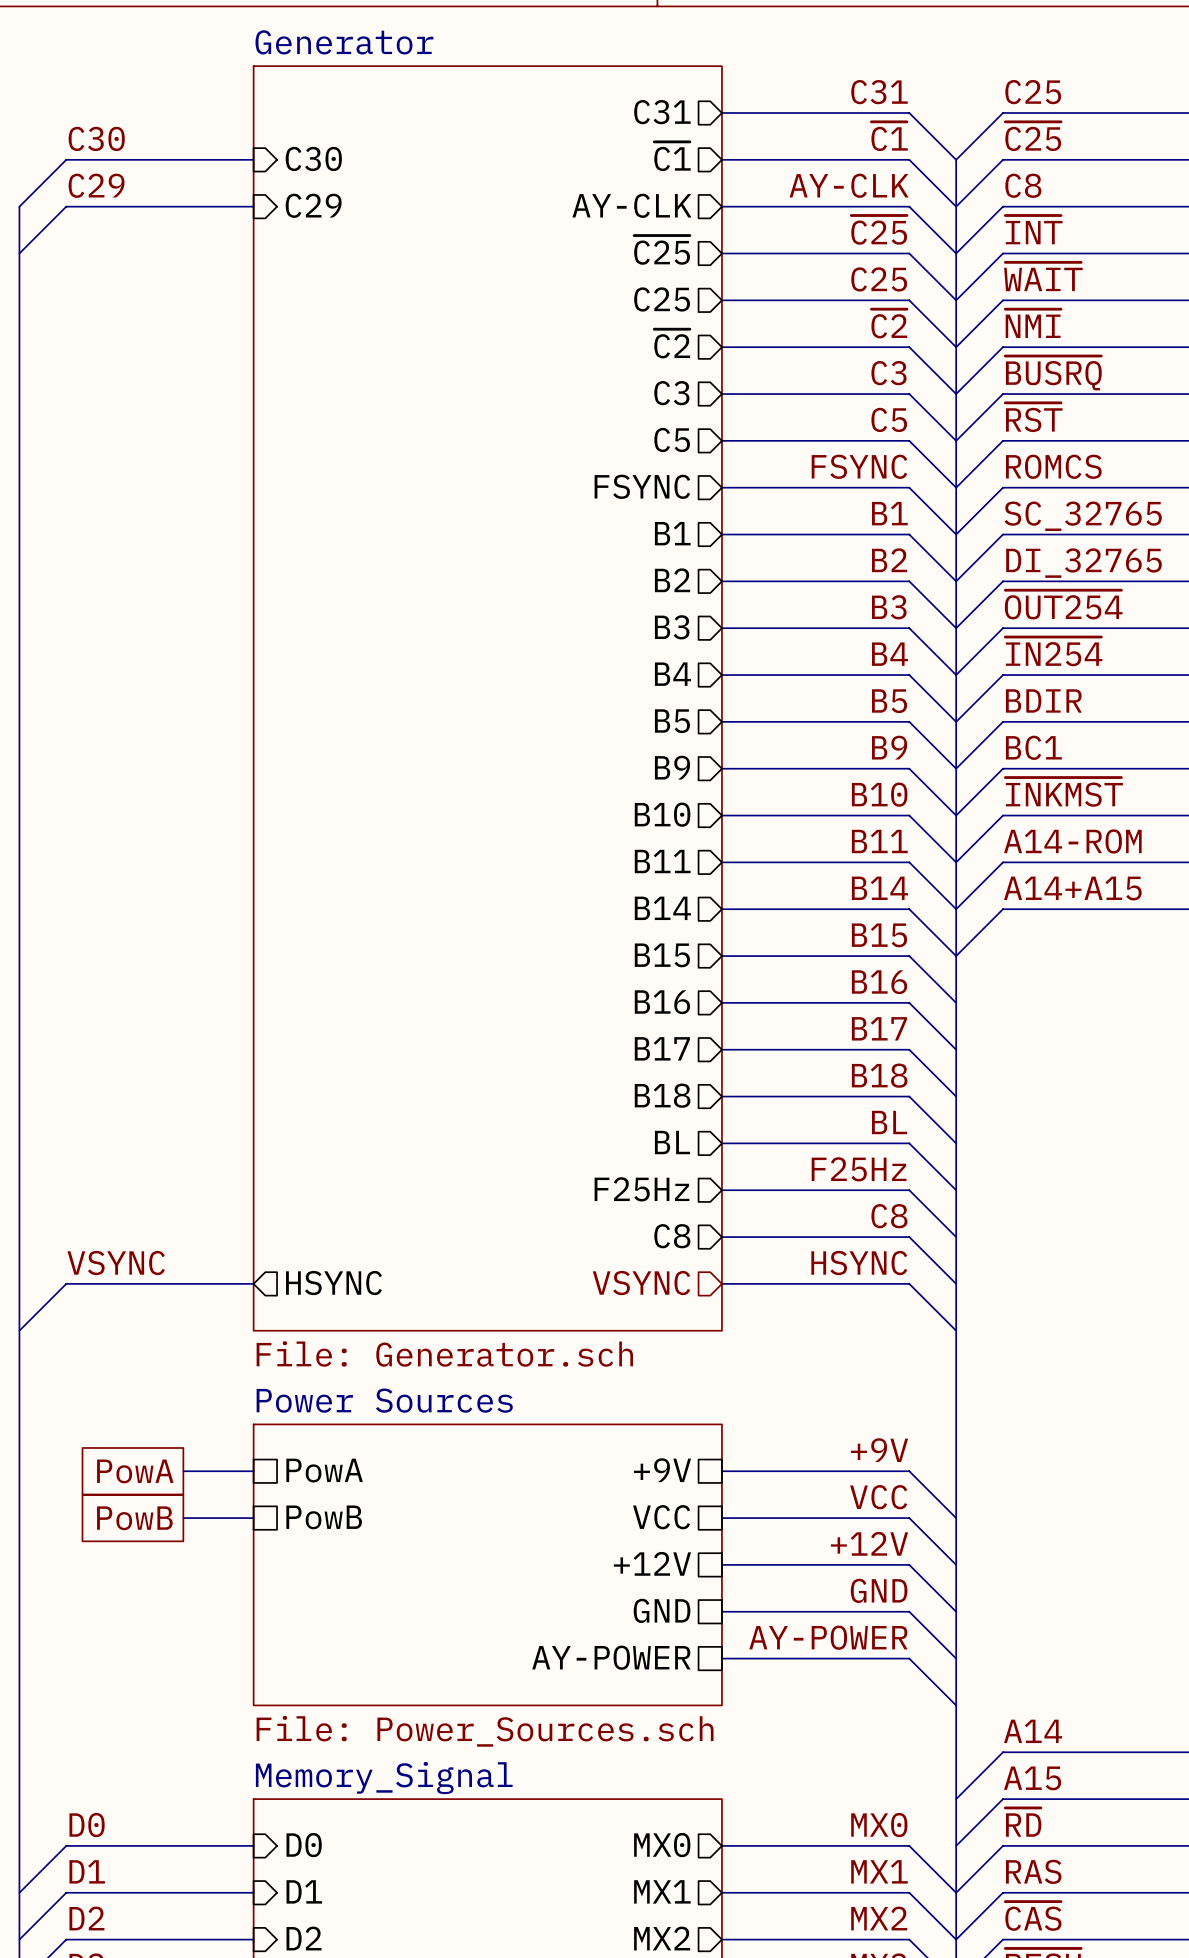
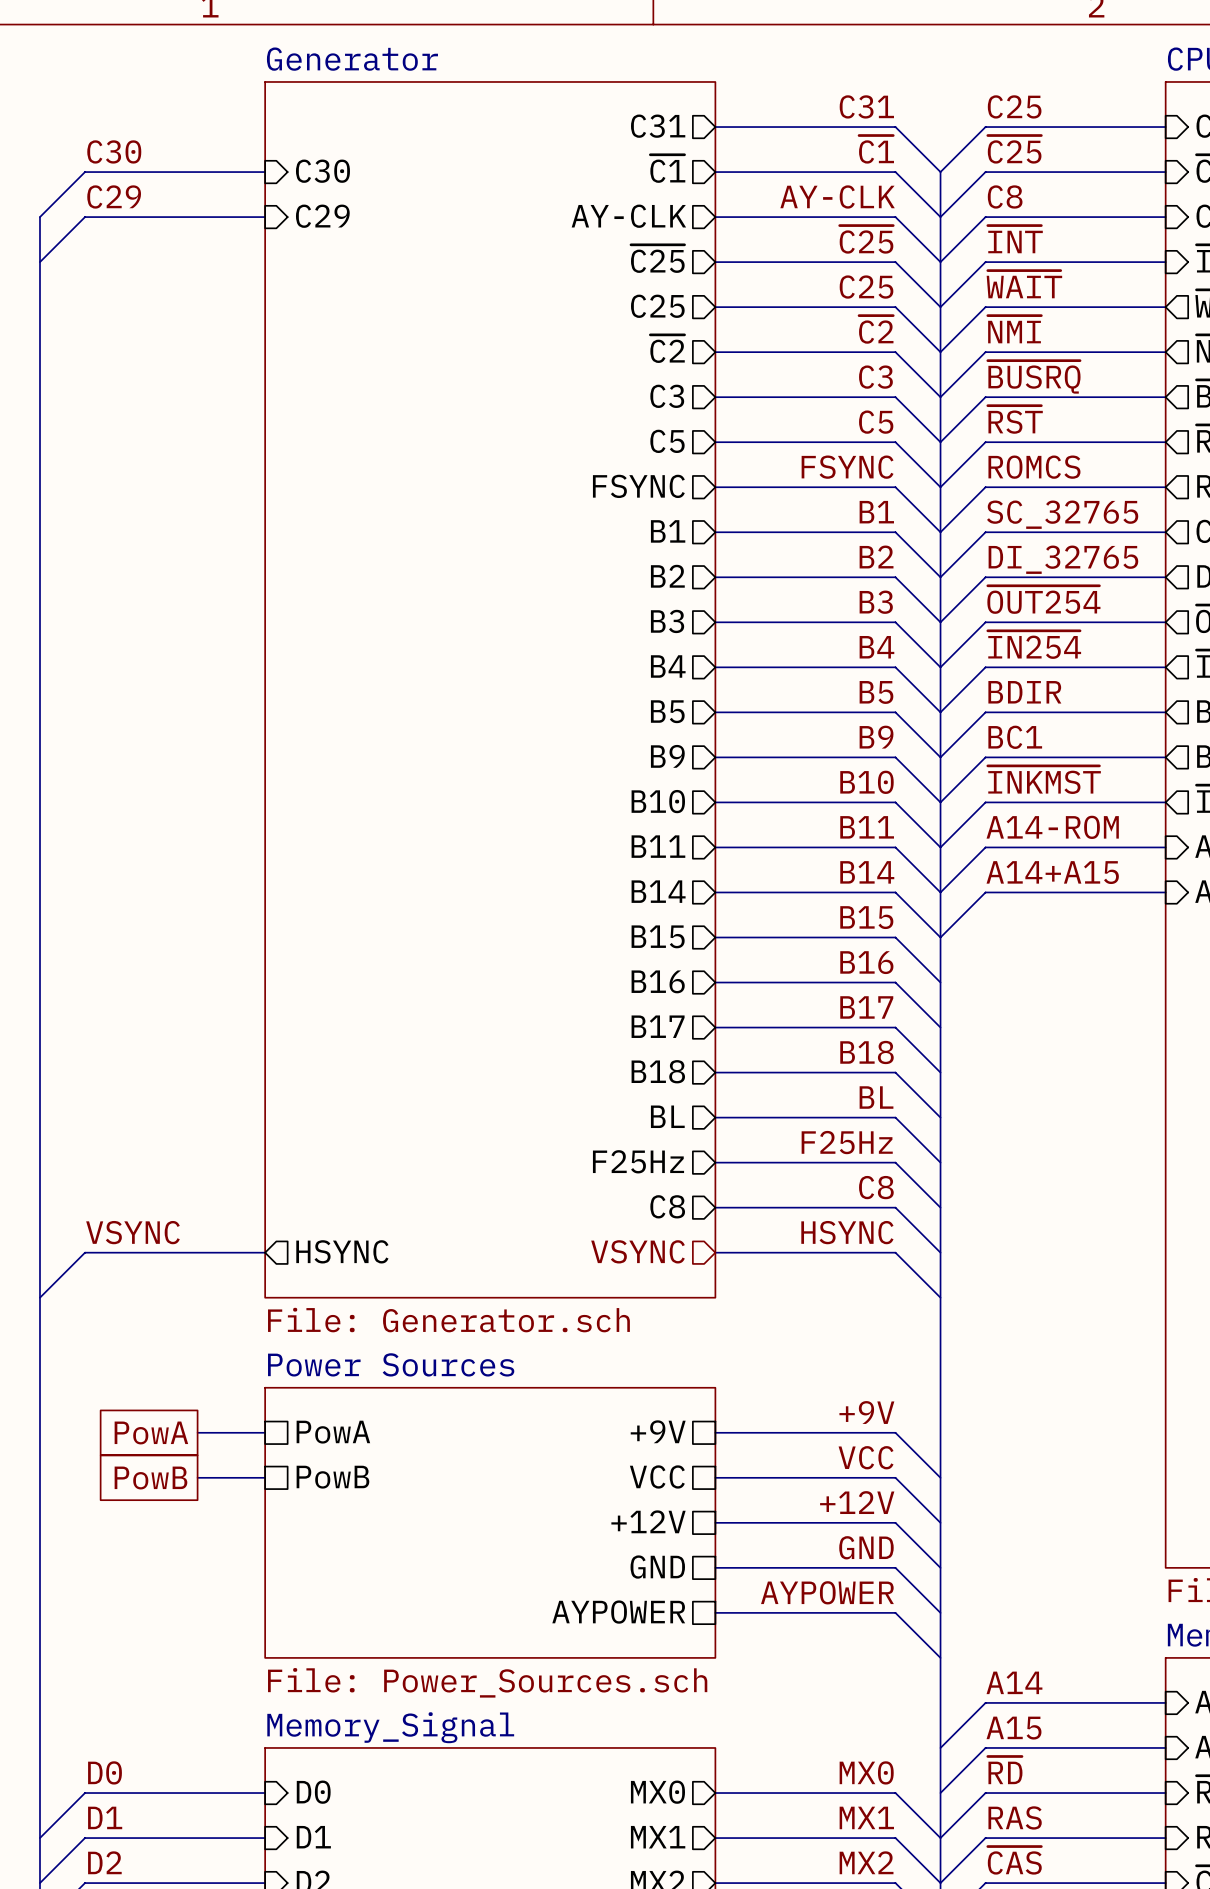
label: AY-POWER (828, 1637) -> AYPOWER (827, 1592)
sheet pin: AY-POWER (611, 1657) -> AYPOWER (618, 1612)

